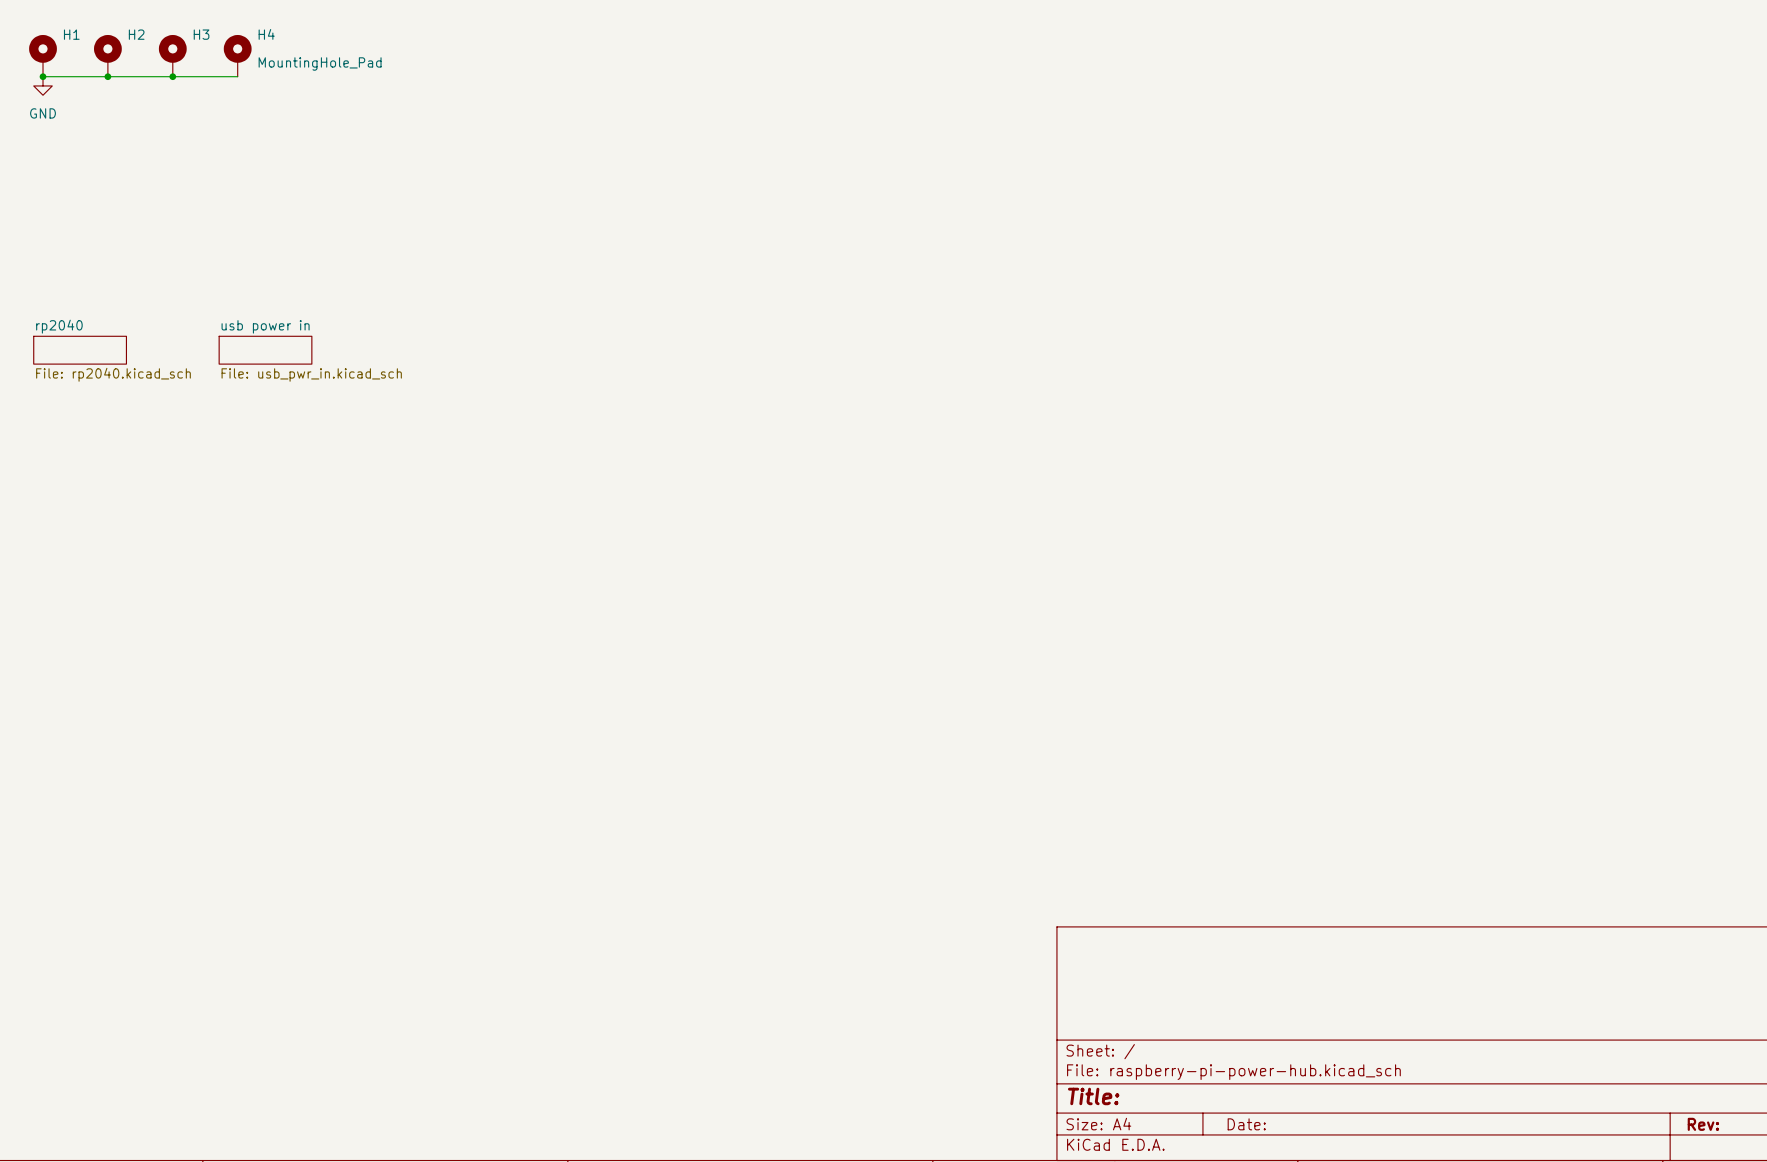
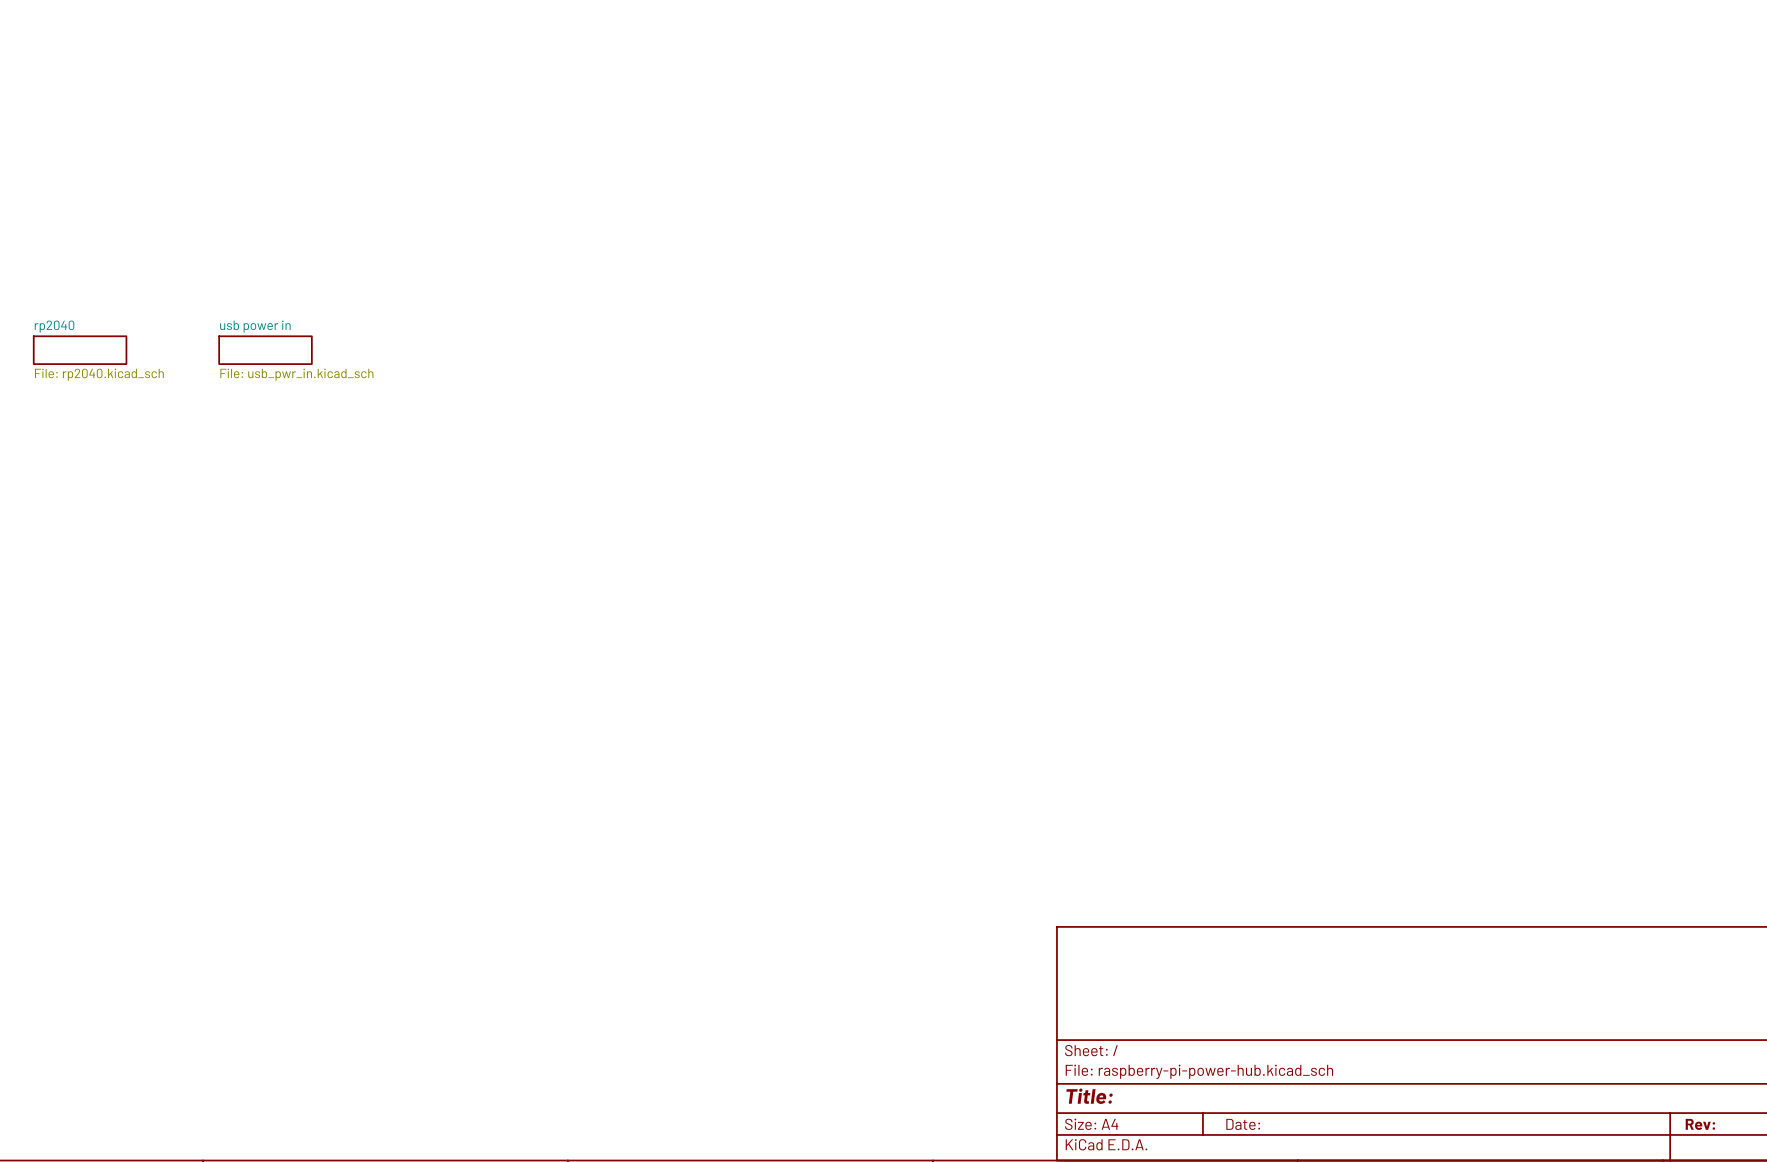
H1: (43, 55) -> none
H2: (107, 55) -> none
H3: (172, 55) -> none
H4: MountingHole_Pad (237, 55) -> none
wire: (43, 76) (237, 76) -> none
junction: (43, 76) -> none
junction: (107, 76) -> none
junction: (172, 76) -> none
power symbol: GND (43, 85) -> none

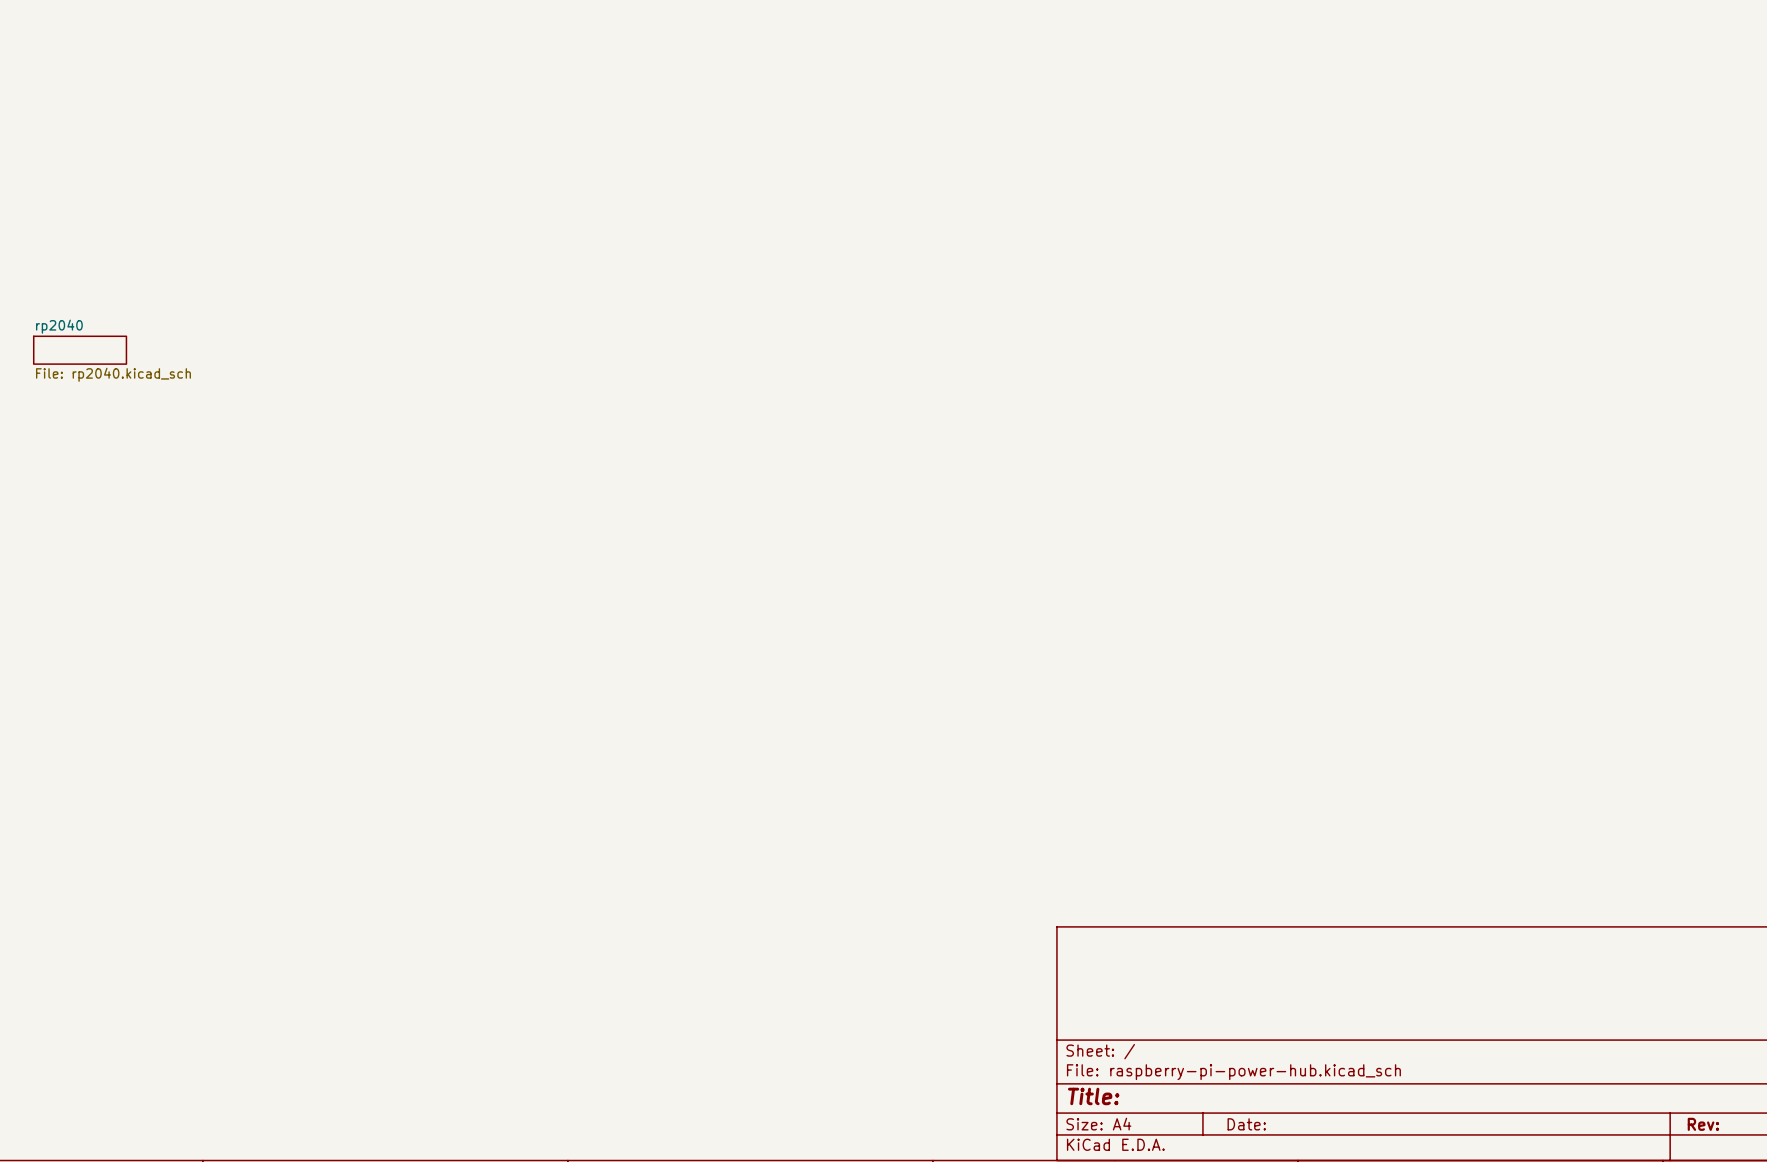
sheet usb power in: File: usb_pwr_in.kicad_sch (265, 350) -> none

